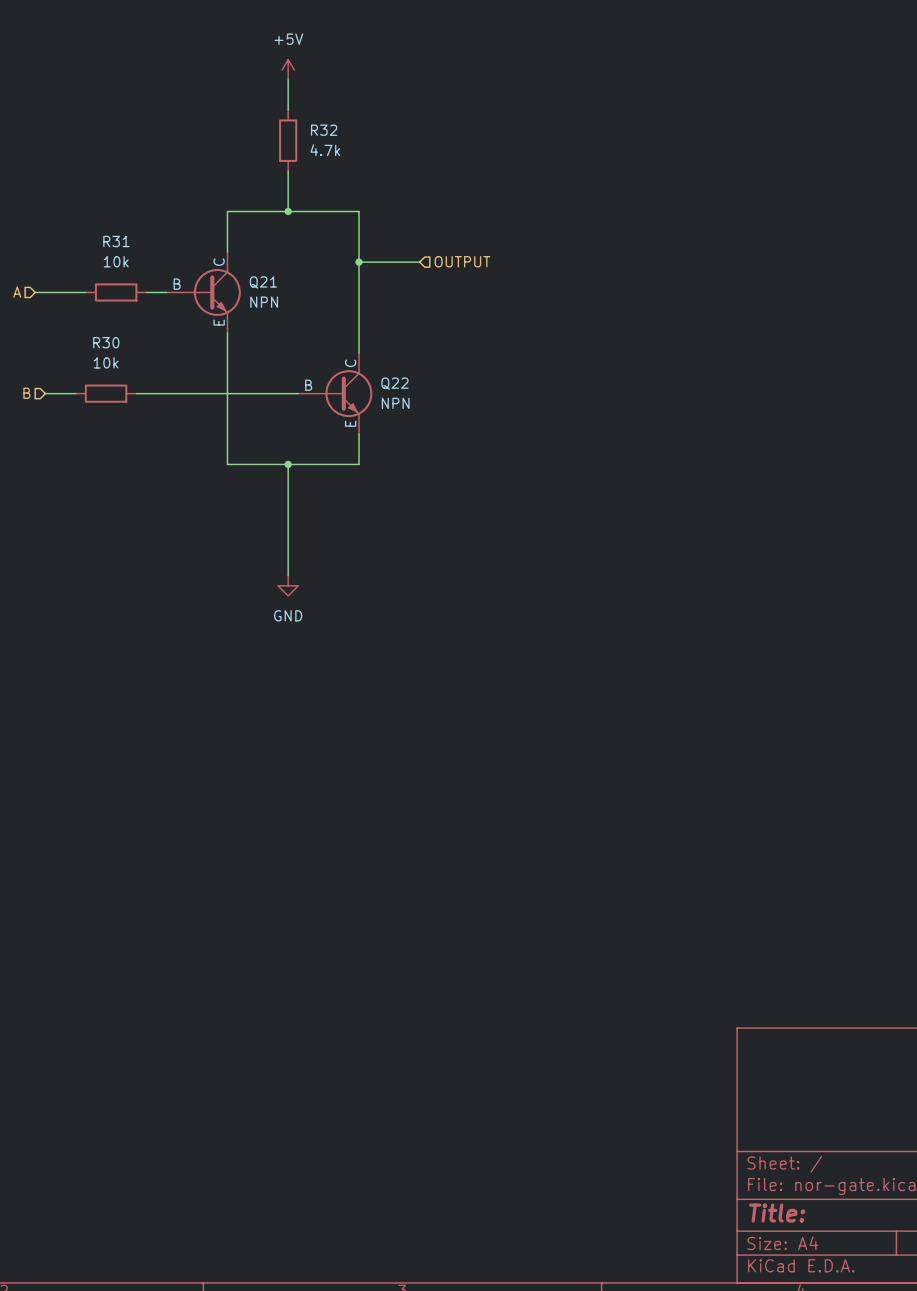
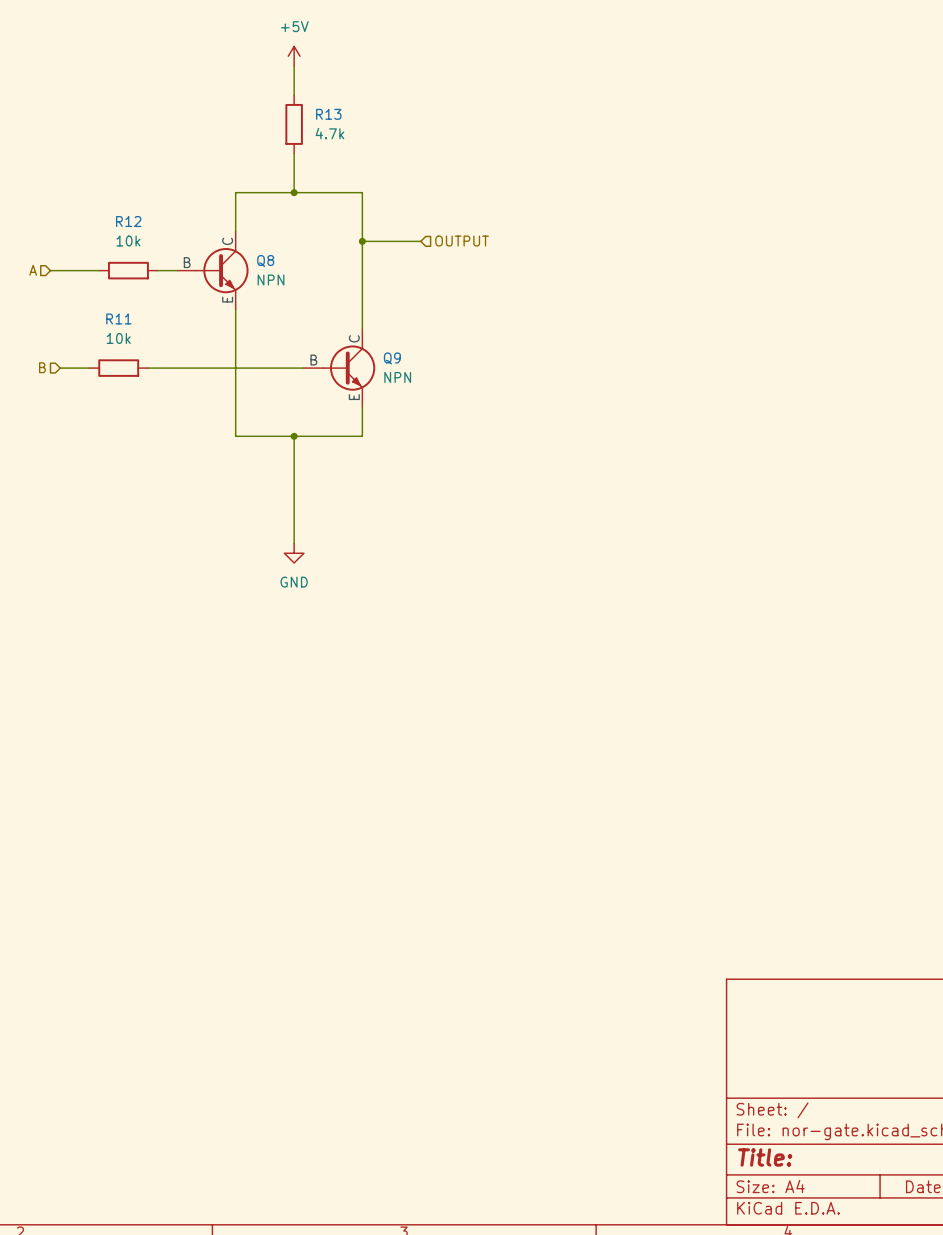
R32 name: R32 (324, 130) -> R13 (328, 114)
R31 name: R31 (116, 241) -> R12 (128, 221)
Q21 name: Q21 (263, 282) -> Q8 (265, 260)
R30 name: R30 (106, 342) -> R11 (118, 318)
Q22 name: Q22 (394, 383) -> Q9 (392, 358)

